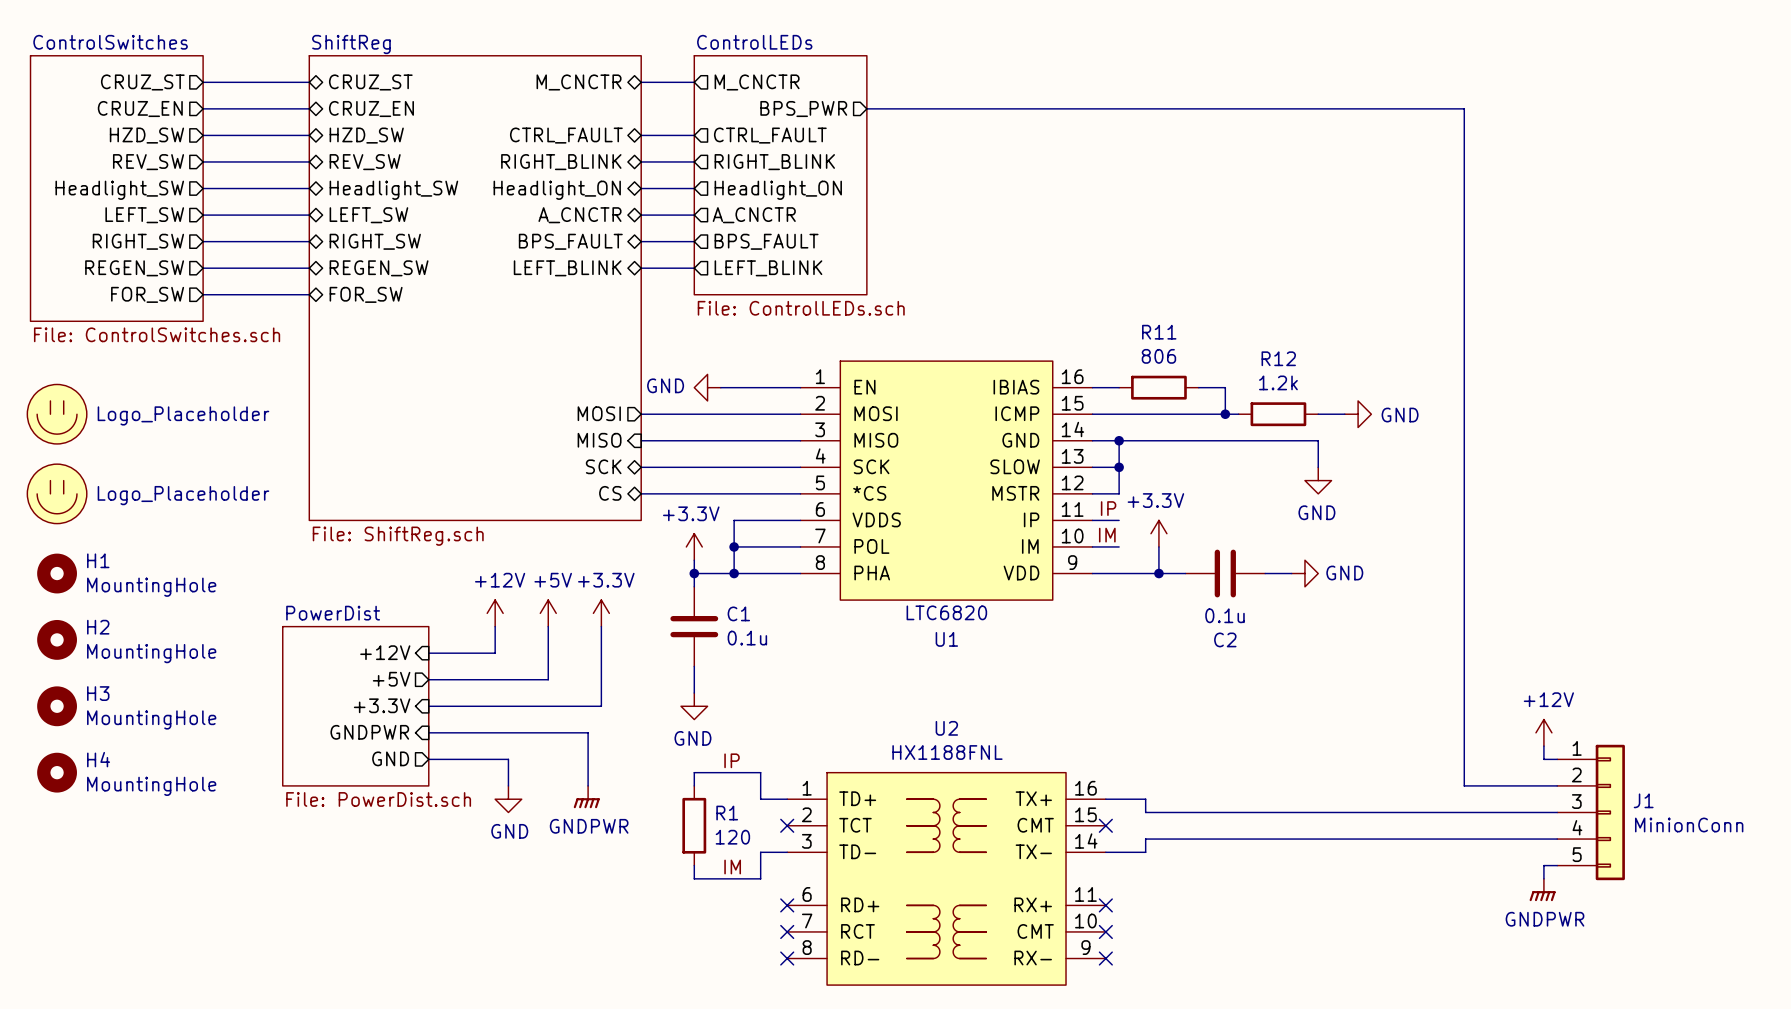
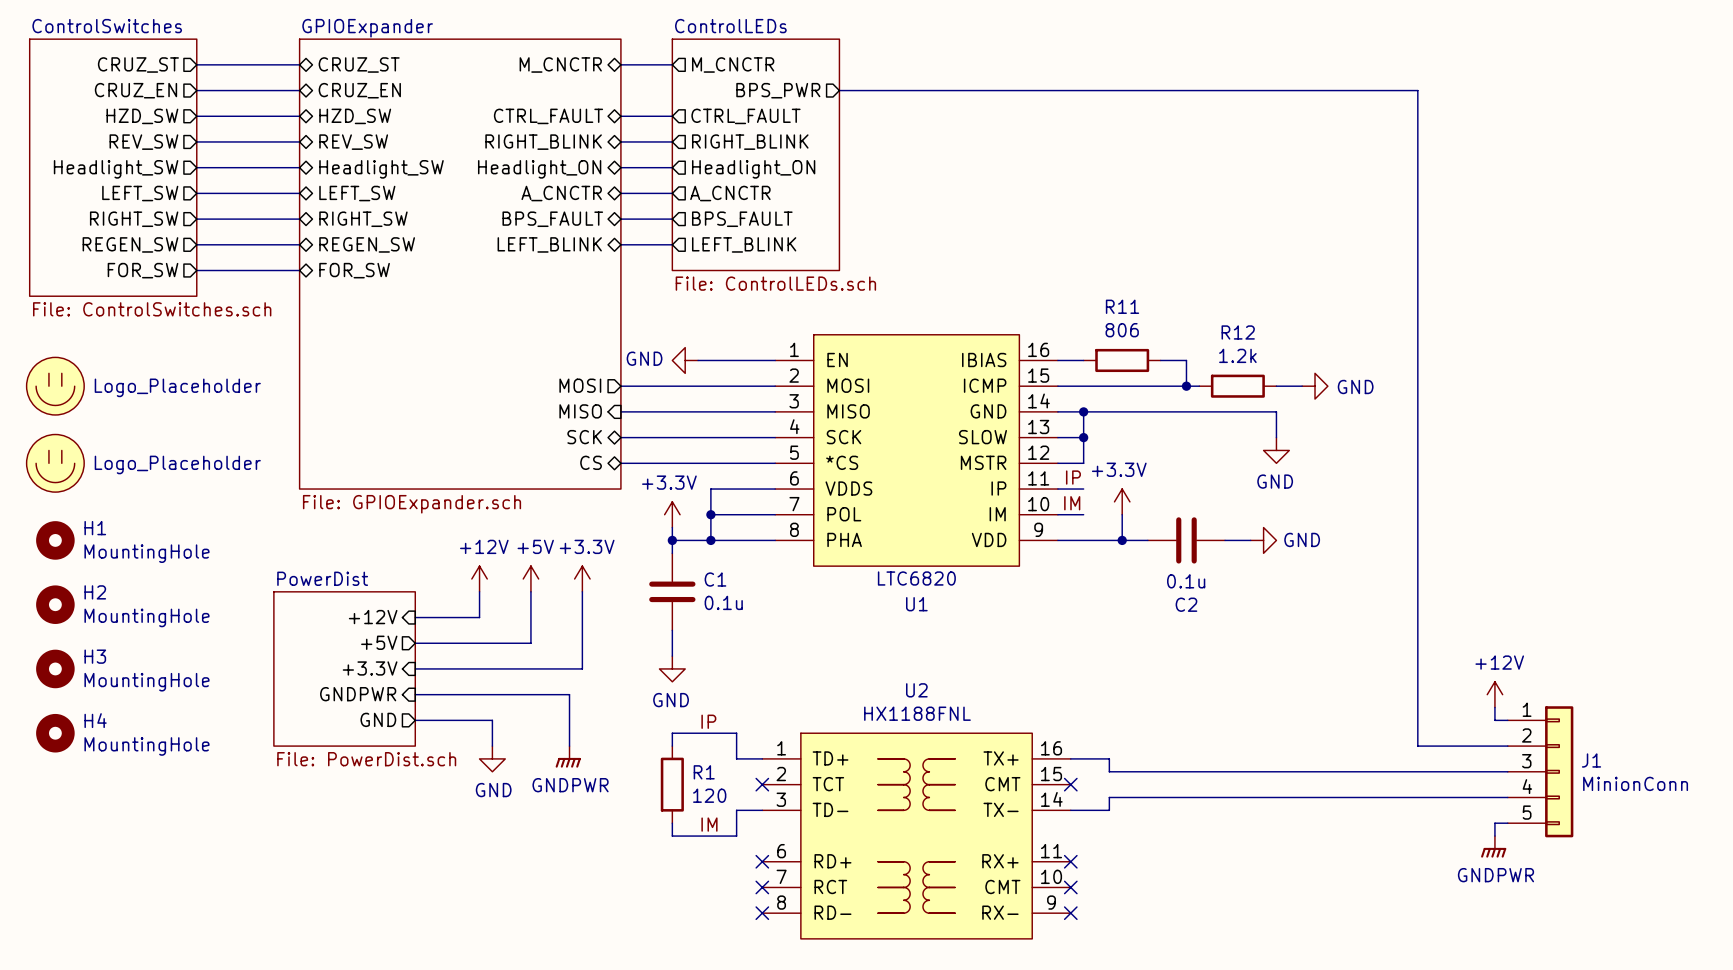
sheet ShiftReg name: ShiftReg (351, 44) -> GPIOExpander (367, 28)
sheet ShiftReg value: File: ShiftReg.sch (398, 536) -> File: GPIOExpander.sch (412, 504)

